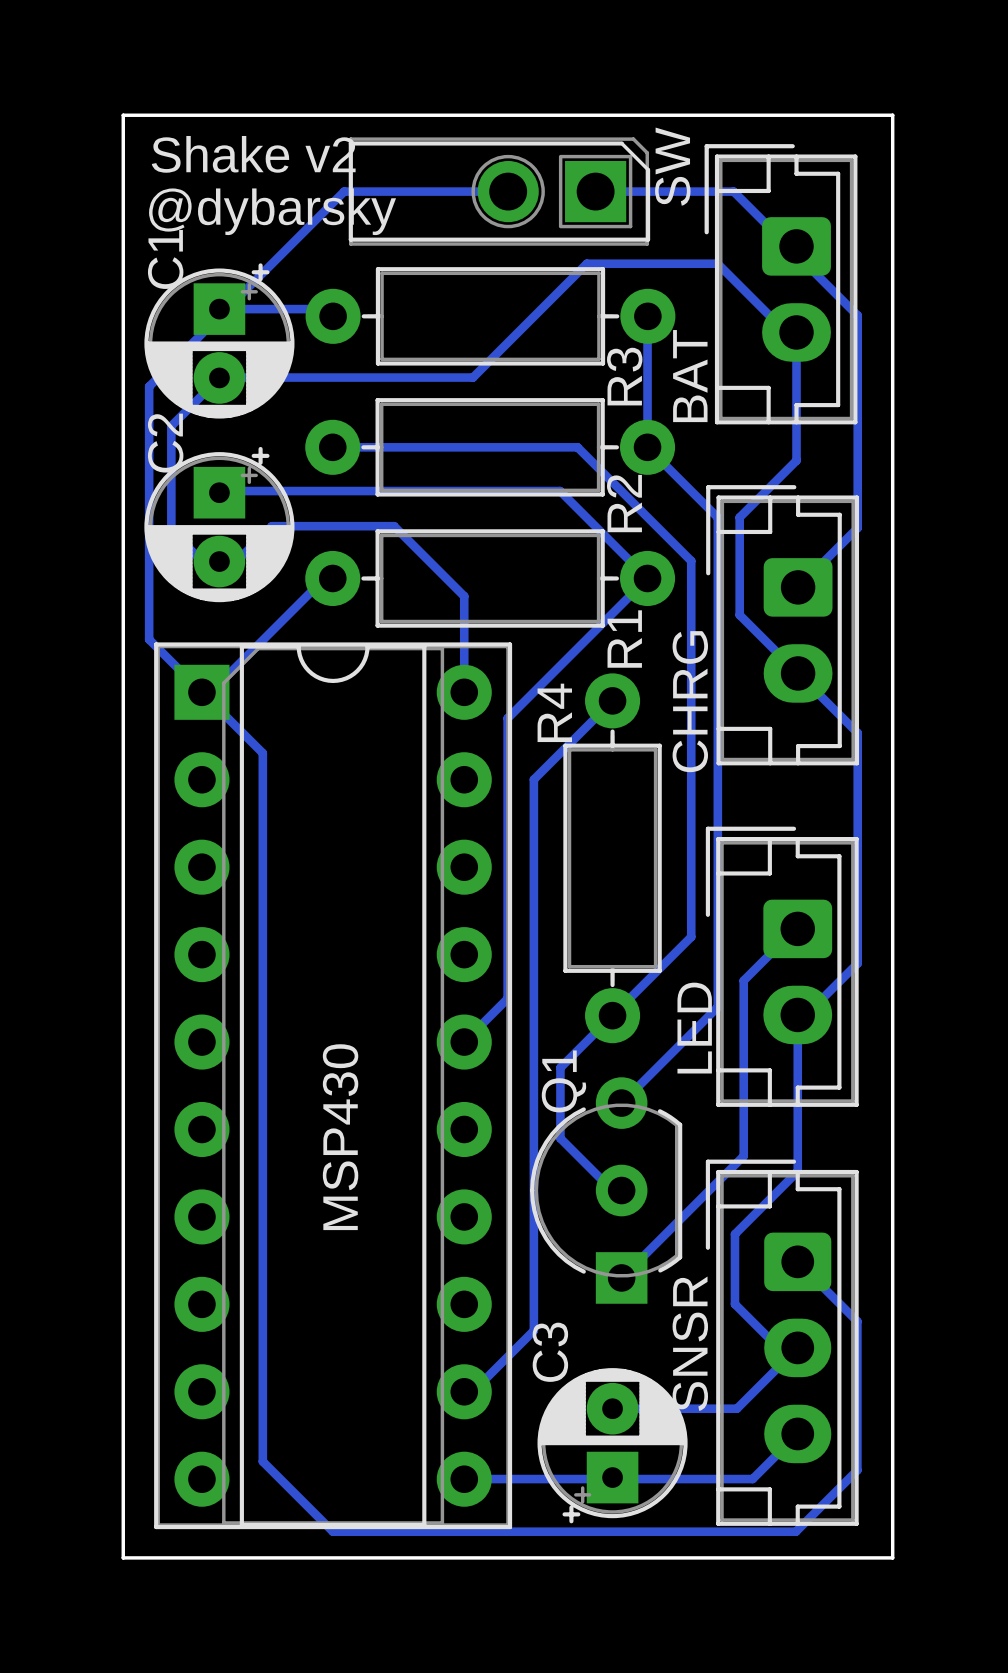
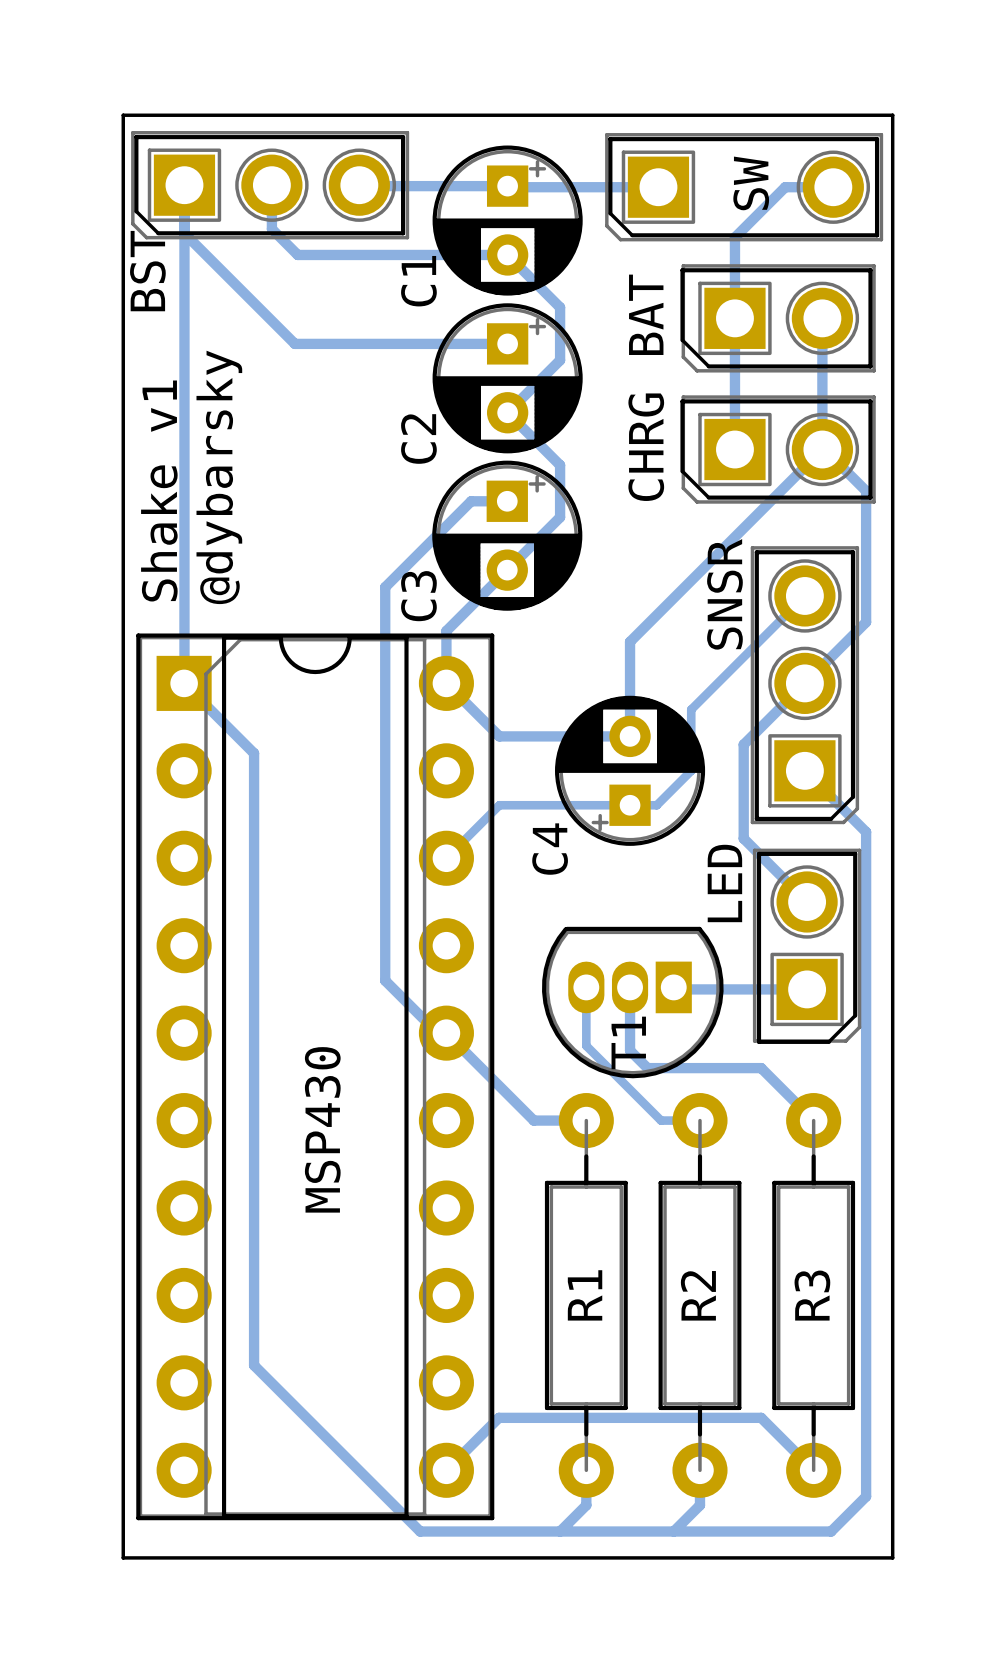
BAT footprint: [704, 144, 858, 425] -> [680, 264, 876, 373]
text: Shake v2 (253, 154) -> none
bottom track: none -> (184, 185) (184, 683)
BST: none -> (270, 185)
bottom track: none -> (271, 185) (271, 229) (297, 254) (507, 254) (560, 307) (560, 360) (507, 412) (560, 465) (560, 517) (446, 630) (446, 683) (499, 736) (630, 736) (630, 641) (822, 449) (822, 318)
bottom track: none -> (360, 186) (507, 186)
bottom track: none -> (508, 187) (658, 187)
SW: none -> (744, 187)
bottom track: none -> (833, 187) (785, 187) (734, 237) (734, 449)
SW: (499, 191) -> none
bottom track: (508, 191) (344, 191) (149, 386) (149, 639) (262, 753) (262, 1461) (332, 1531) (795, 1531) (857, 1470) (857, 1321) (797, 1261) -> none
bottom track: (595, 191) (733, 191) (857, 315) (857, 527) (797, 587) -> none
text rotation: 0° (272, 211) -> 90° counterclockwise (219, 477)
bottom track: none -> (184, 233) (294, 343) (507, 343)
C1 name position: C1 (165, 259) -> C1 (418, 281)
C1 footprint: [144, 263, 295, 419] -> [432, 145, 583, 296]
R3 footprint: [305, 267, 676, 366] -> [772, 1093, 856, 1498]
bottom track: (219, 309) (325, 309) -> none
bottom track: (647, 324) (647, 429) -> none
bottom track: (777, 324) (717, 263) (586, 263) (473, 377) (219, 377) (171, 426) (171, 530) (202, 561) (219, 561) -> none
bottom track: (796, 332) (796, 460) (739, 517) (739, 615) (857, 733) (857, 963) (806, 1014) (797, 1014) (797, 1171) (734, 1234) (734, 1304) (778, 1347) (797, 1347) (736, 1408) (621, 1408) -> none
R3 name position: R3 (624, 376) -> R3 (812, 1295)
BAT name position: BAT (690, 376) -> BAT (646, 314)
R2 footprint: [305, 398, 676, 497] -> [658, 1093, 742, 1498]
C2 name position: C2 (165, 443) -> C2 (418, 438)
C2 footprint: [144, 446, 295, 603] -> [432, 303, 583, 454]
bottom track: (350, 447) (577, 447) (691, 560) (691, 709) -> (804, 595) (691, 709)
bottom track: (647, 447) (717, 517) (717, 1007) (621, 1103) -> none
CHRG: none -> (778, 449)
bottom track: none -> (824, 449) (866, 491) (866, 622) (743, 744) (743, 838) (807, 901)
bottom track: (221, 491) (560, 491) (647, 578) (507, 718) (507, 998) (464, 1042) -> none
text: none -> Shake v1 (159, 491)
bottom track: none -> (507, 501) (471, 501) (385, 587) (385, 980) (437, 1033)
R2 name position: R2 (624, 503) -> R2 (698, 1295)
R1 footprint: [305, 529, 676, 628] -> [544, 1093, 628, 1498]
bottom track: (236, 561) (271, 526) (394, 526) (464, 596) (464, 683) -> none
bottom track: (324, 578) (210, 692) -> none
CHRG: (782, 625) -> none
R1 name position: R1 (624, 639) -> R1 (585, 1295)
bottom track: none -> (184, 683) (254, 753) (254, 1365) (420, 1531) (831, 1531) (866, 1496) (866, 832) (804, 770)
SNSR: none -> (804, 685)
bottom track: (612, 700) (533, 779) (533, 1330) (472, 1391) (464, 1391) -> none
C4: none -> (630, 770)
bottom track: (691, 770) (691, 936) (560, 1067) (560, 1138) (612, 1190) -> (691, 770) (656, 805) (499, 805) (446, 858)
LED footprint: [705, 826, 859, 1107] -> [752, 848, 862, 1044]
R4: (612, 858) -> none
bottom track: (797, 928) (795, 928) (743, 980) (743, 1156) (621, 1277) -> none
bottom track: none -> (586, 987) (586, 1045) (661, 1120) (699, 1120)
bottom track: none -> (630, 987) (630, 1050) (647, 1068) (761, 1068) (813, 1120)
bottom track: none -> (678, 989) (807, 989)
T1: none -> (632, 1002)
LED name position: LED (694, 1028) -> LED (724, 883)
bottom track: none -> (446, 1033) (533, 1120) (577, 1120)
MSP430 position: (333, 1085) -> (315, 1076)
Q1: (606, 1190) -> none
SNSR: (782, 1342) -> none
C3 name position: C3 (550, 1352) -> C3 (418, 596)
C3 footprint: [537, 1368, 688, 1524] -> [432, 460, 583, 611]
bottom track: (797, 1433) (752, 1479) (464, 1479) -> none
bottom track: none -> (446, 1470) (498, 1417) (761, 1417) (813, 1470)
bottom track: none -> (699, 1470) (699, 1505) (673, 1531)
bottom track: none -> (586, 1472) (586, 1505) (560, 1531)

